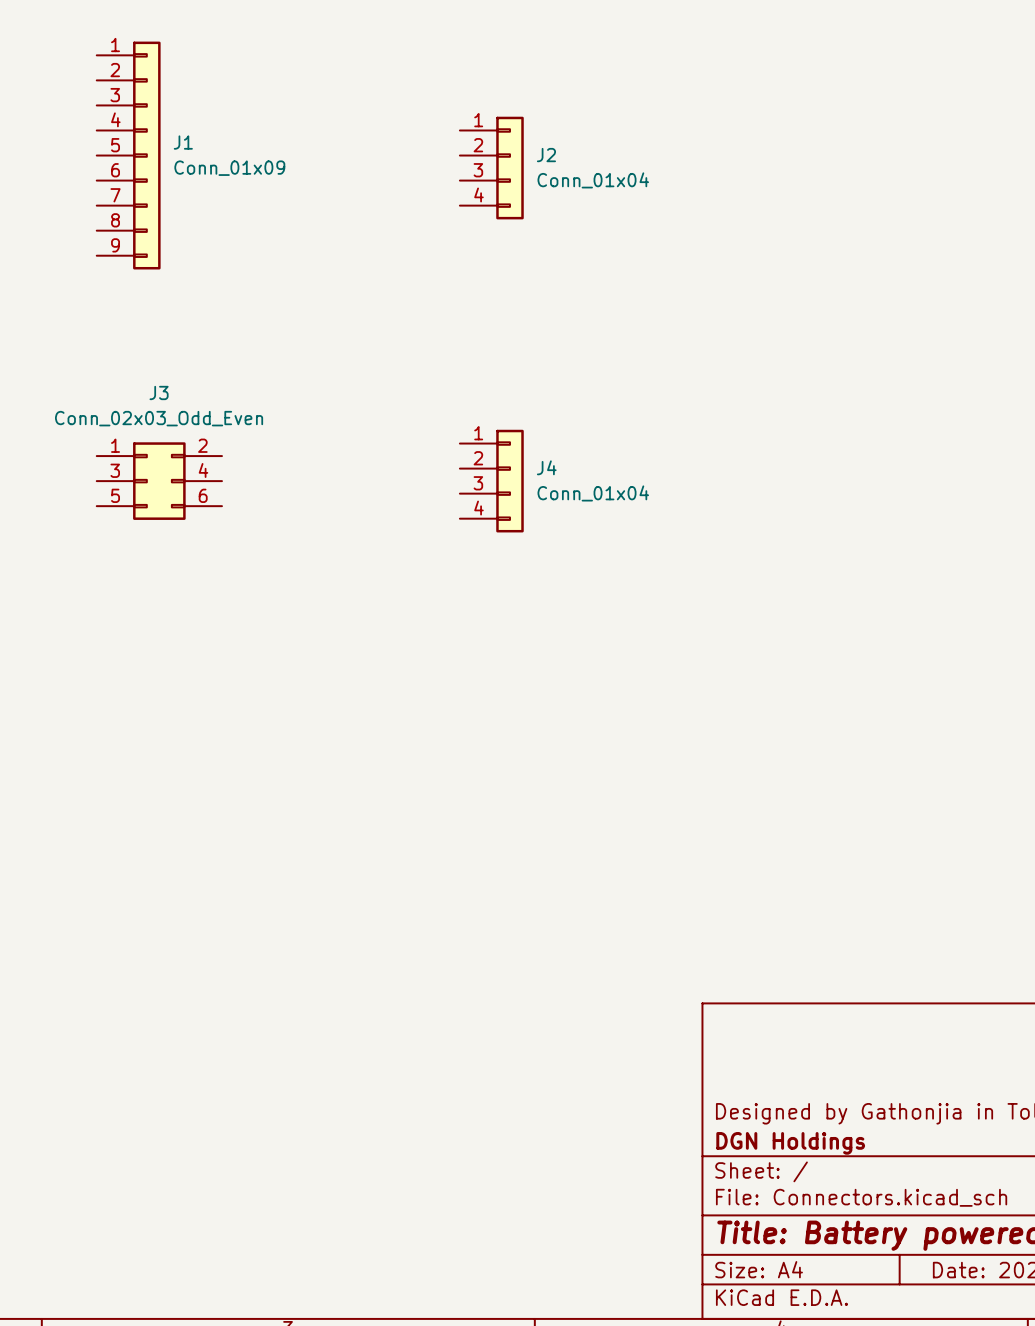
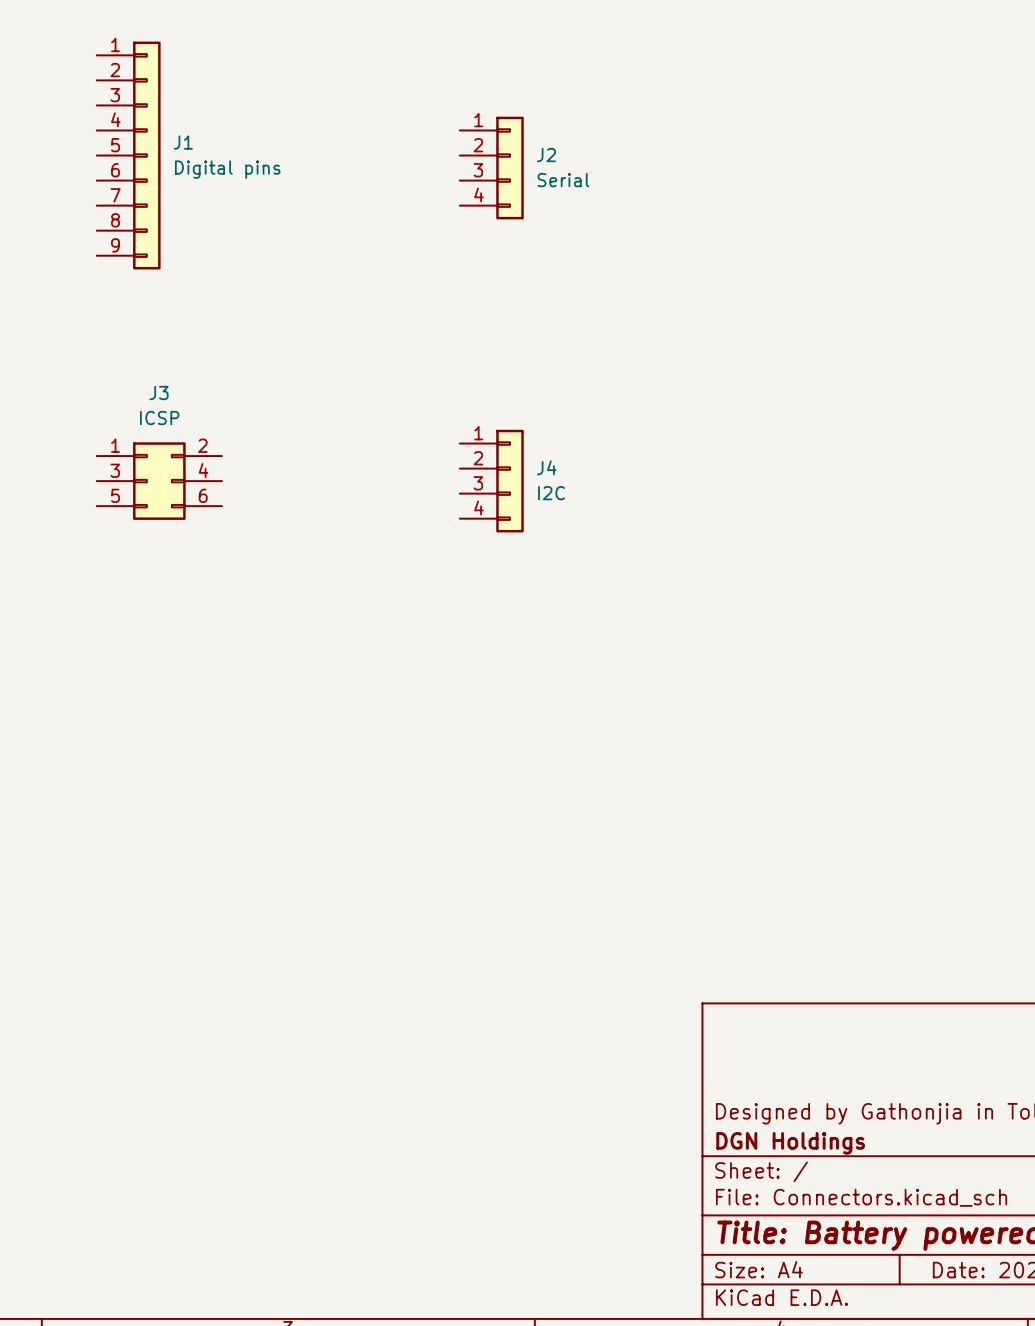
J1 value: Conn_01x09 (229, 168) -> Digital pins (227, 169)
J2 value: Conn_01x04 (593, 180) -> Serial (563, 180)
J3 value: Conn_02x03_Odd_Even (159, 418) -> ICSP (159, 418)
J4 value: Conn_01x04 (593, 493) -> I2C (551, 493)

